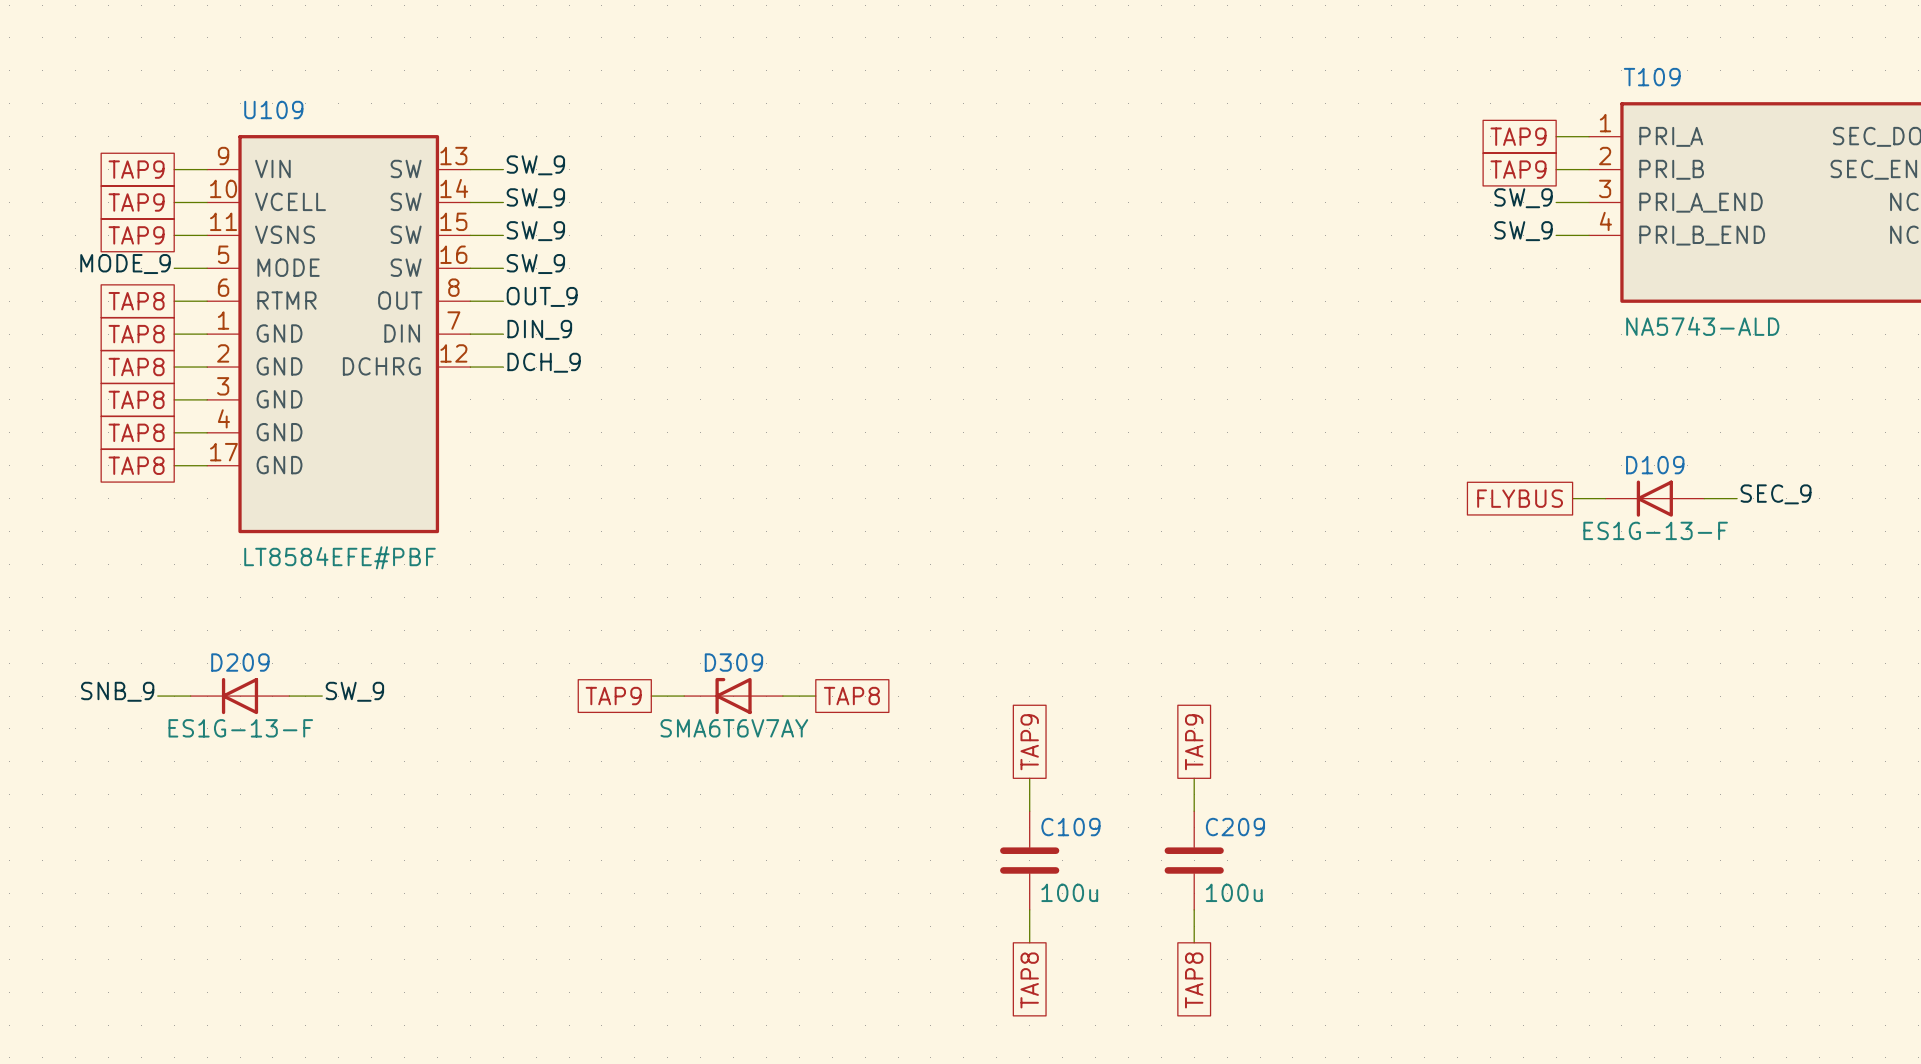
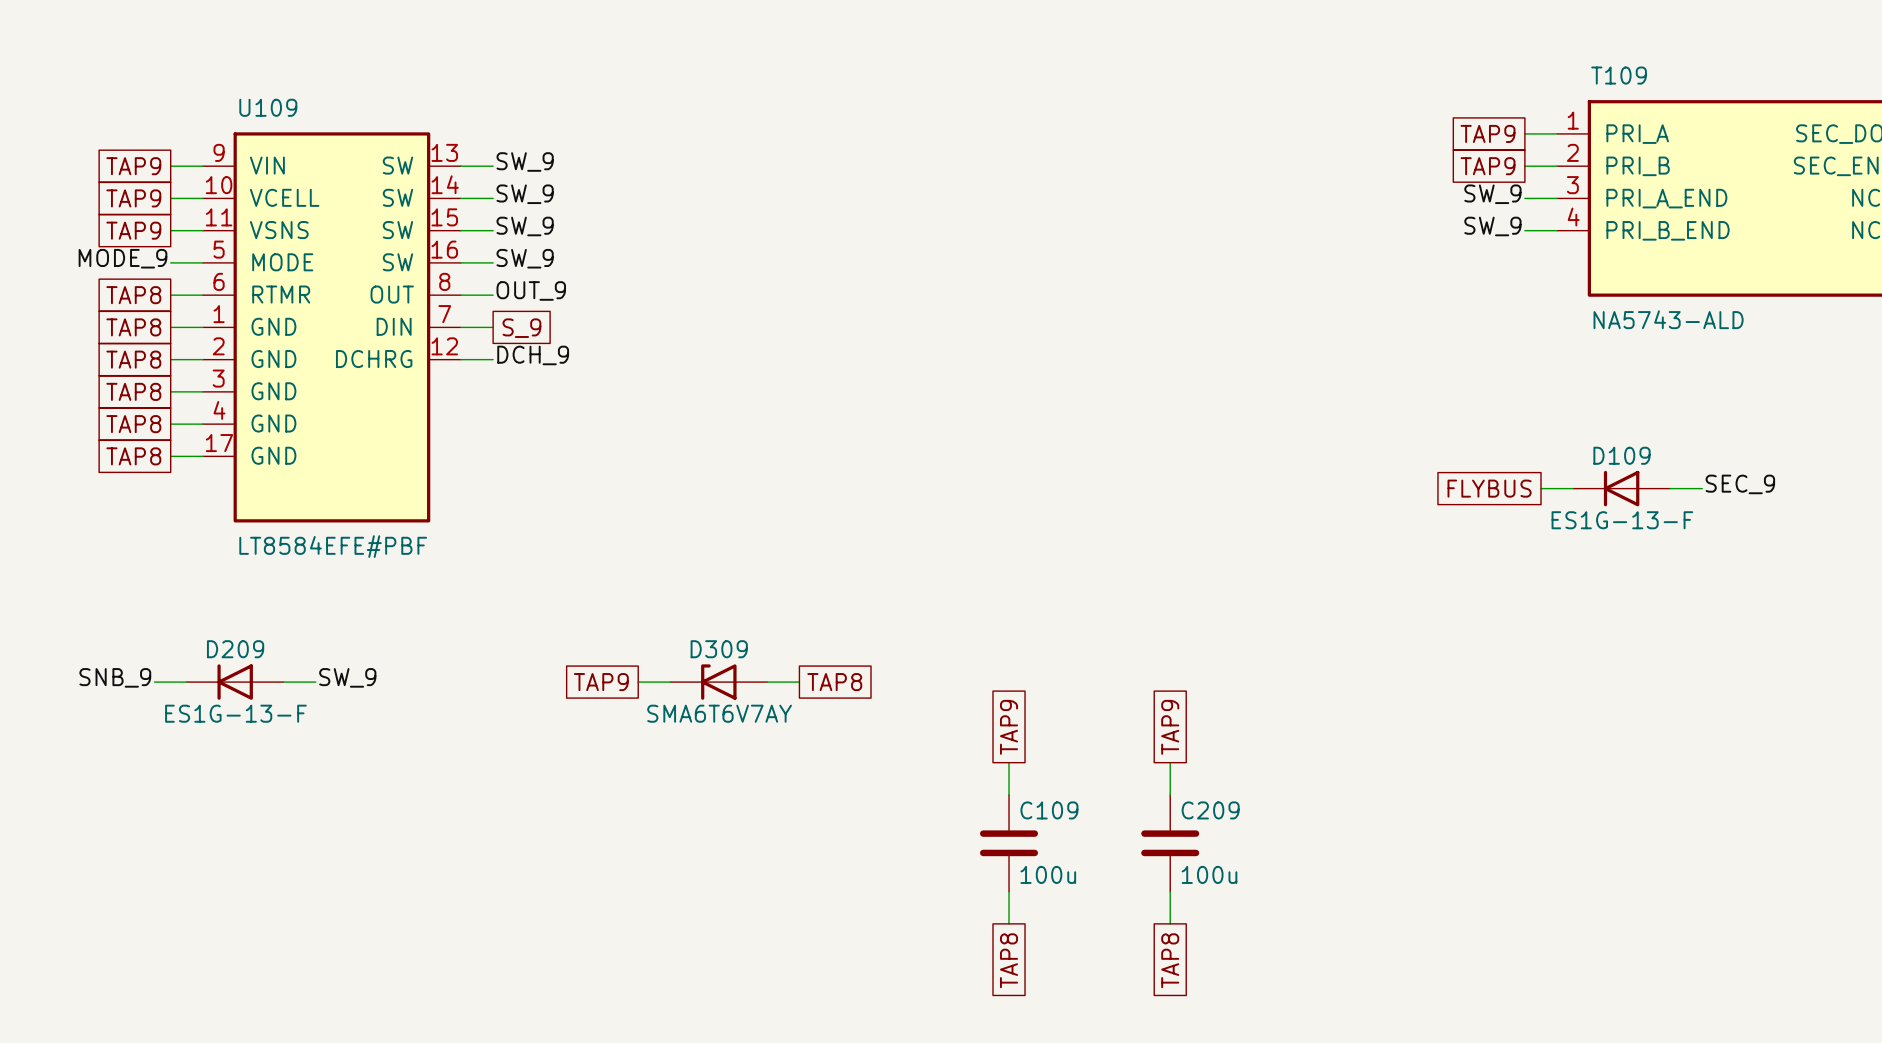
label: DIN_9 (539, 329) -> none
global label: none -> S_9 (521, 328)

